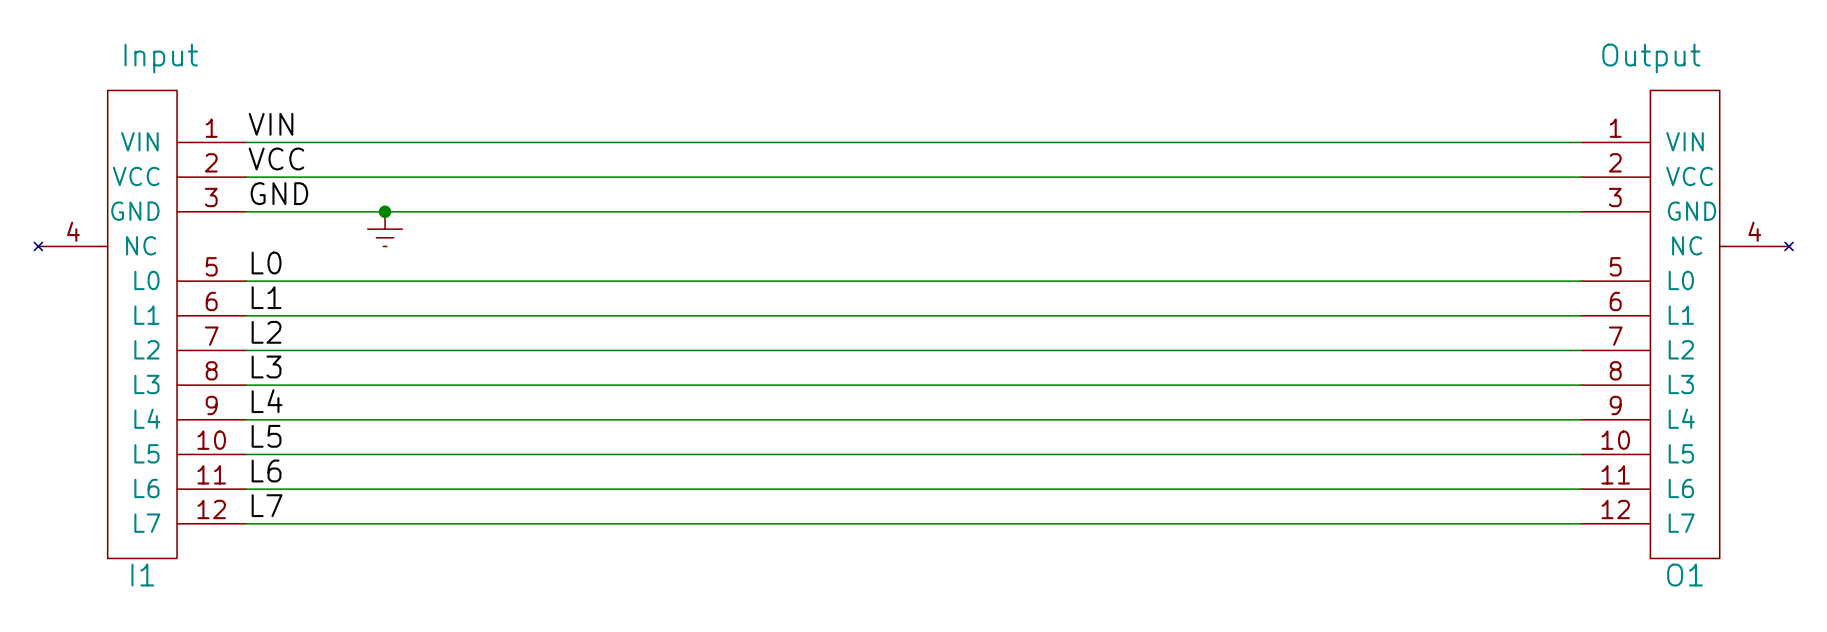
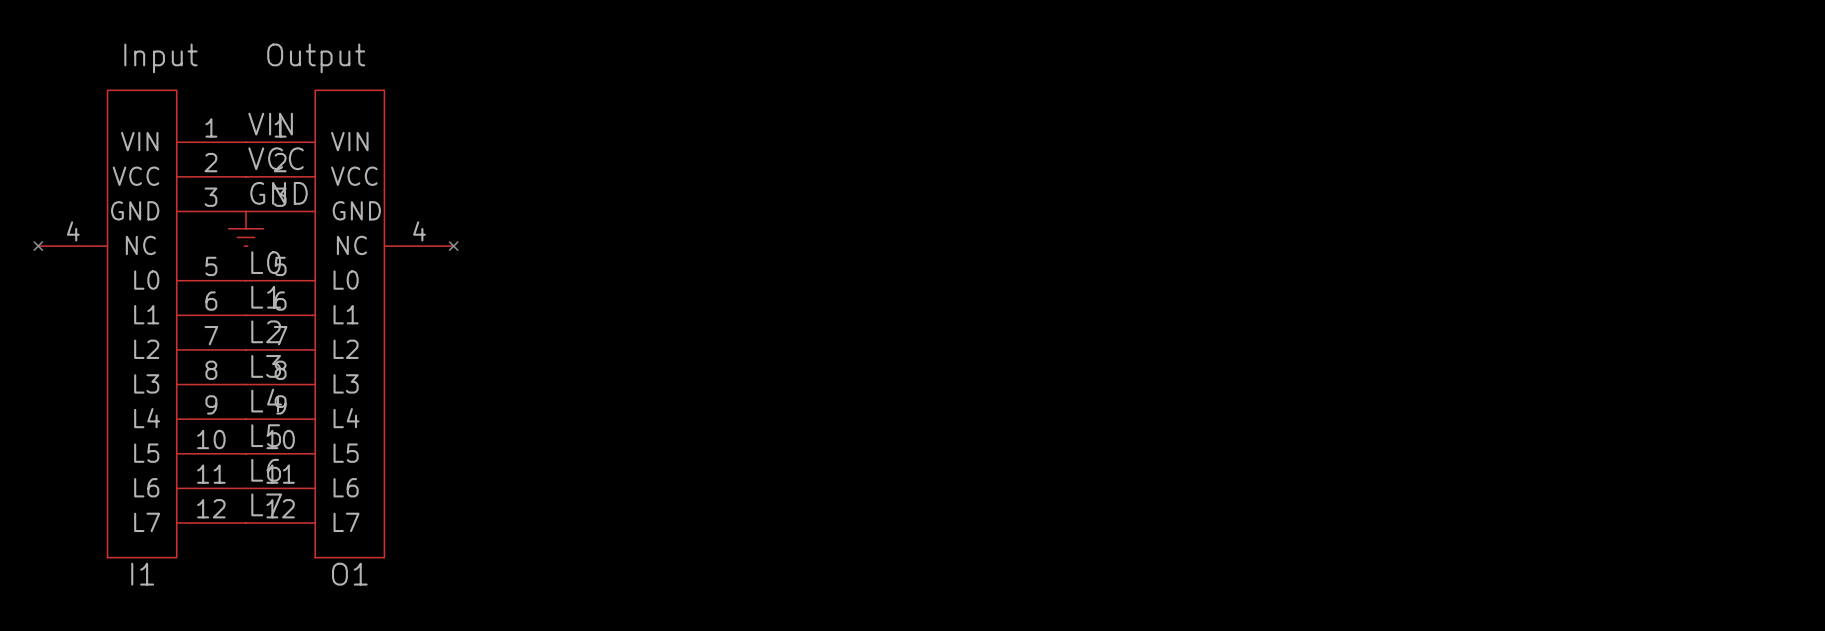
wire: (246, 142) (1581, 142) -> none
wire: (246, 177) (1581, 177) -> none
wire: (246, 211) (1581, 211) -> none
junction: (385, 211) -> none
power symbol position: (385, 229) -> (245, 228)
wire: (246, 281) (1581, 281) -> none
wire: (246, 315) (1581, 315) -> none
O1 position: (1687, 324) -> (351, 323)
wire: (246, 350) (1581, 350) -> none
wire: (246, 385) (1581, 385) -> none
wire: (246, 419) (1581, 419) -> none
wire: (246, 454) (1581, 454) -> none
wire: (246, 489) (1581, 489) -> none
wire: (246, 523) (1581, 523) -> none

